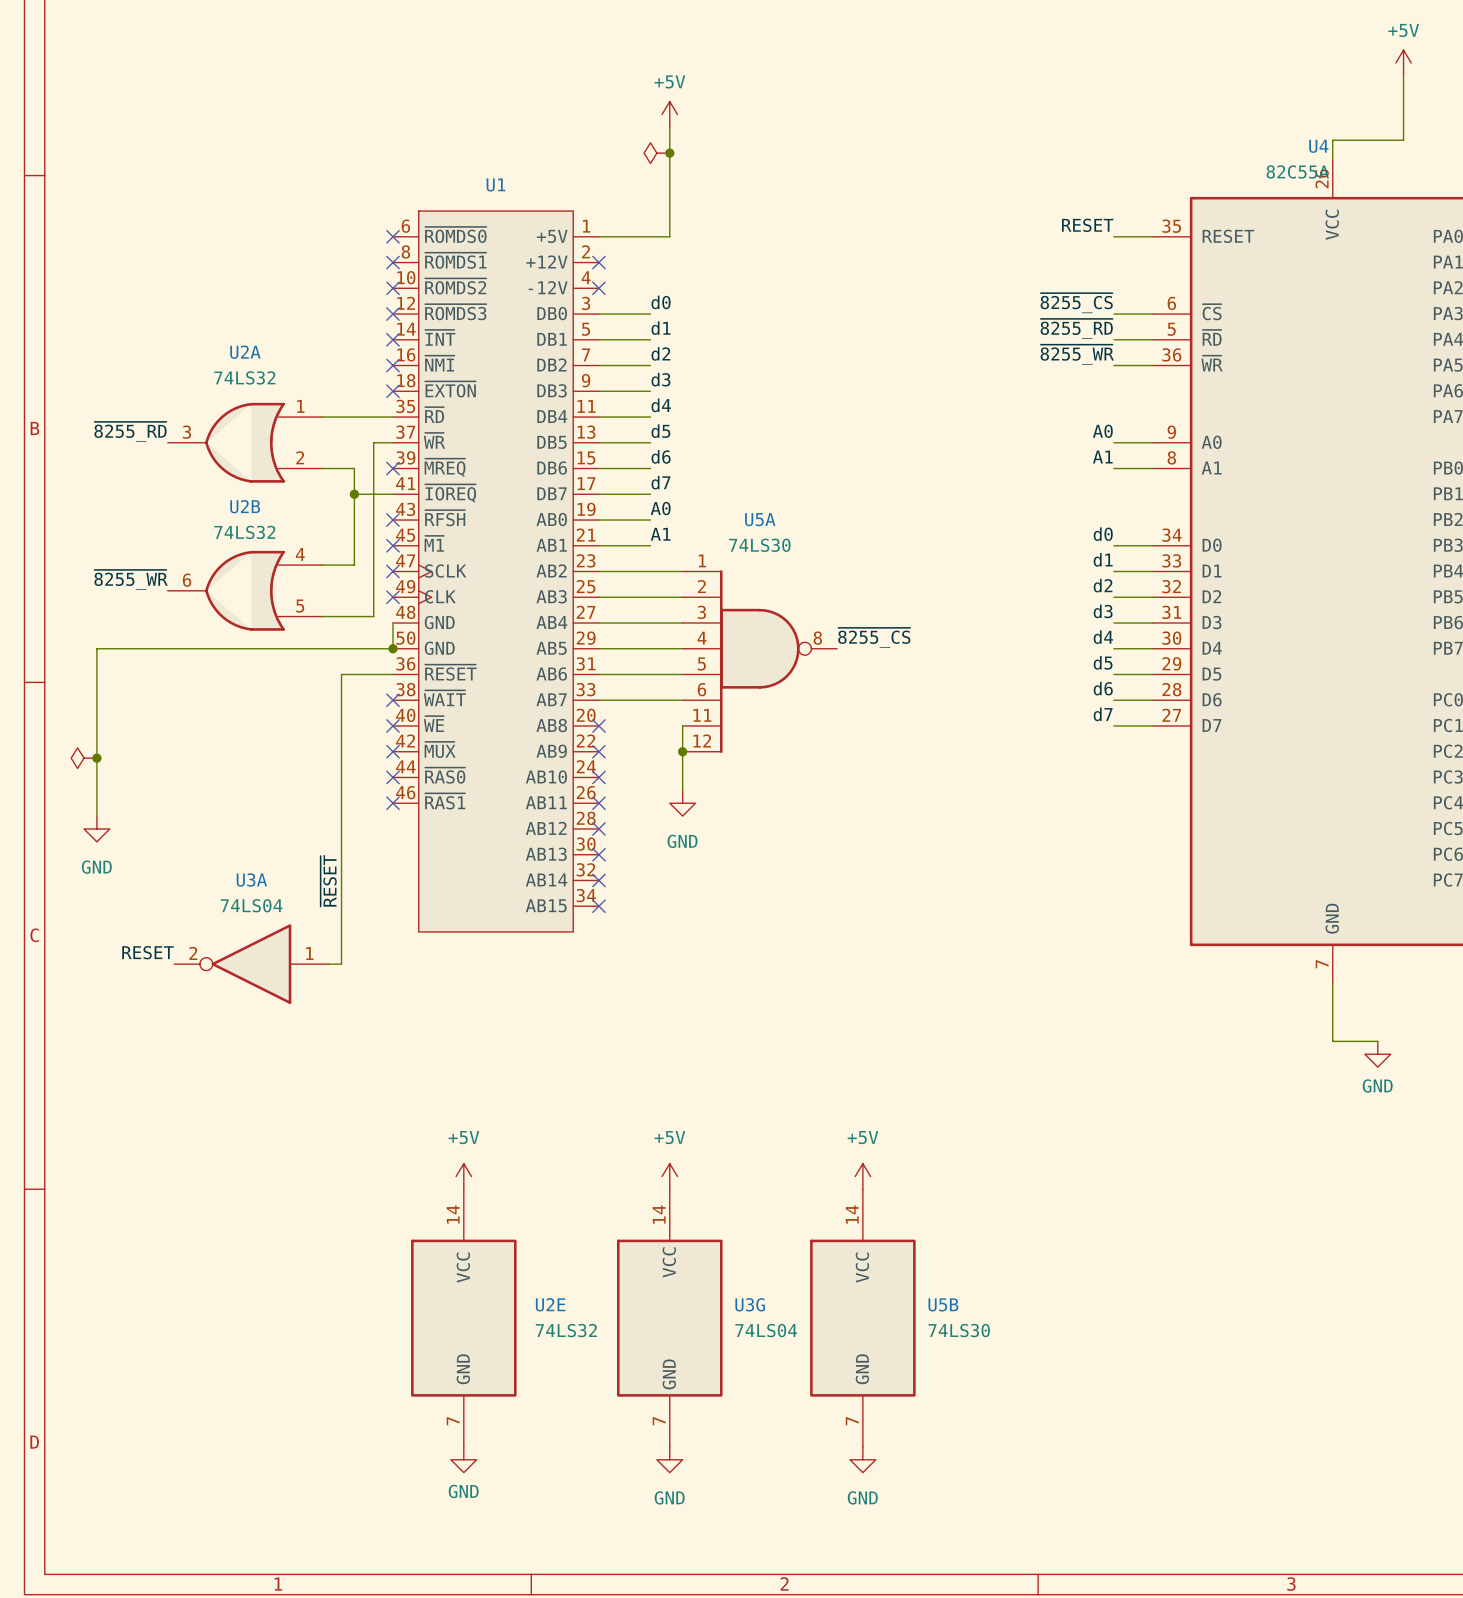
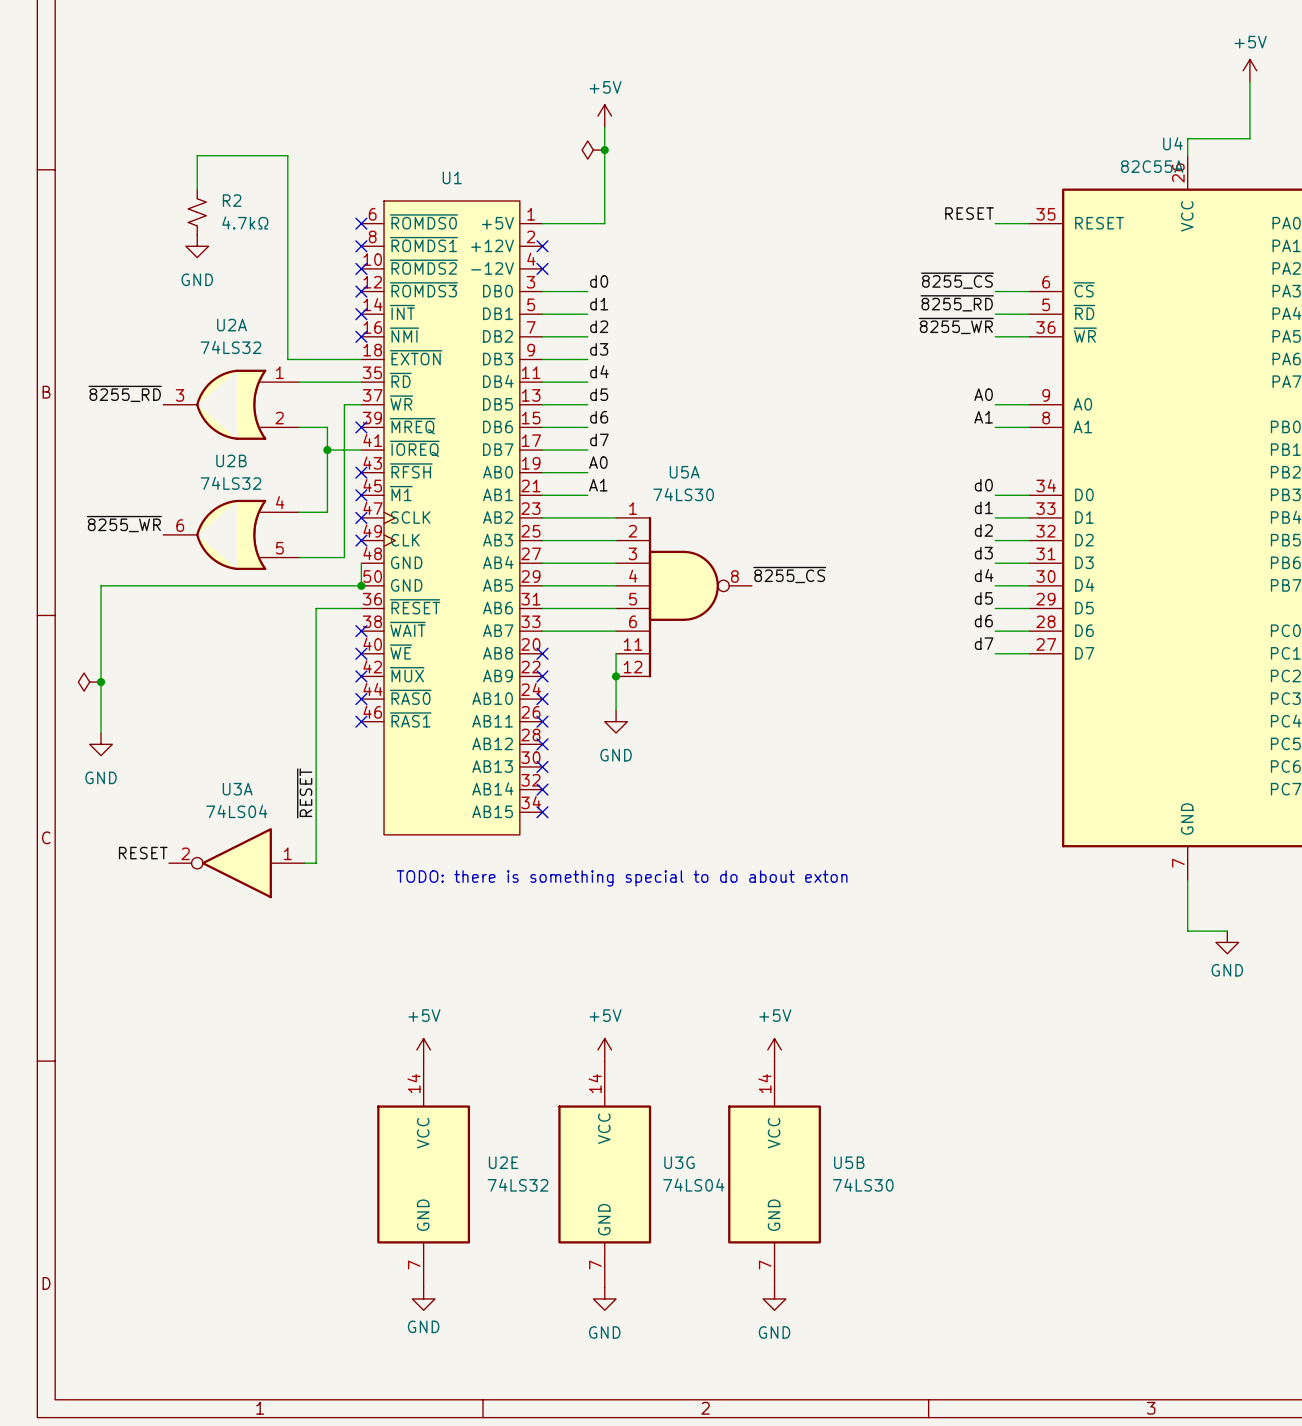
wire: none -> (197, 189) (197, 155) (287, 155) (287, 359) (361, 359)
R2: none -> 4.7kΩ (197, 212)
power symbol: none -> GND (197, 246)
no-connect mark: (393, 391) -> none
text: none -> TODO: there is something special to do about exton (622, 878)

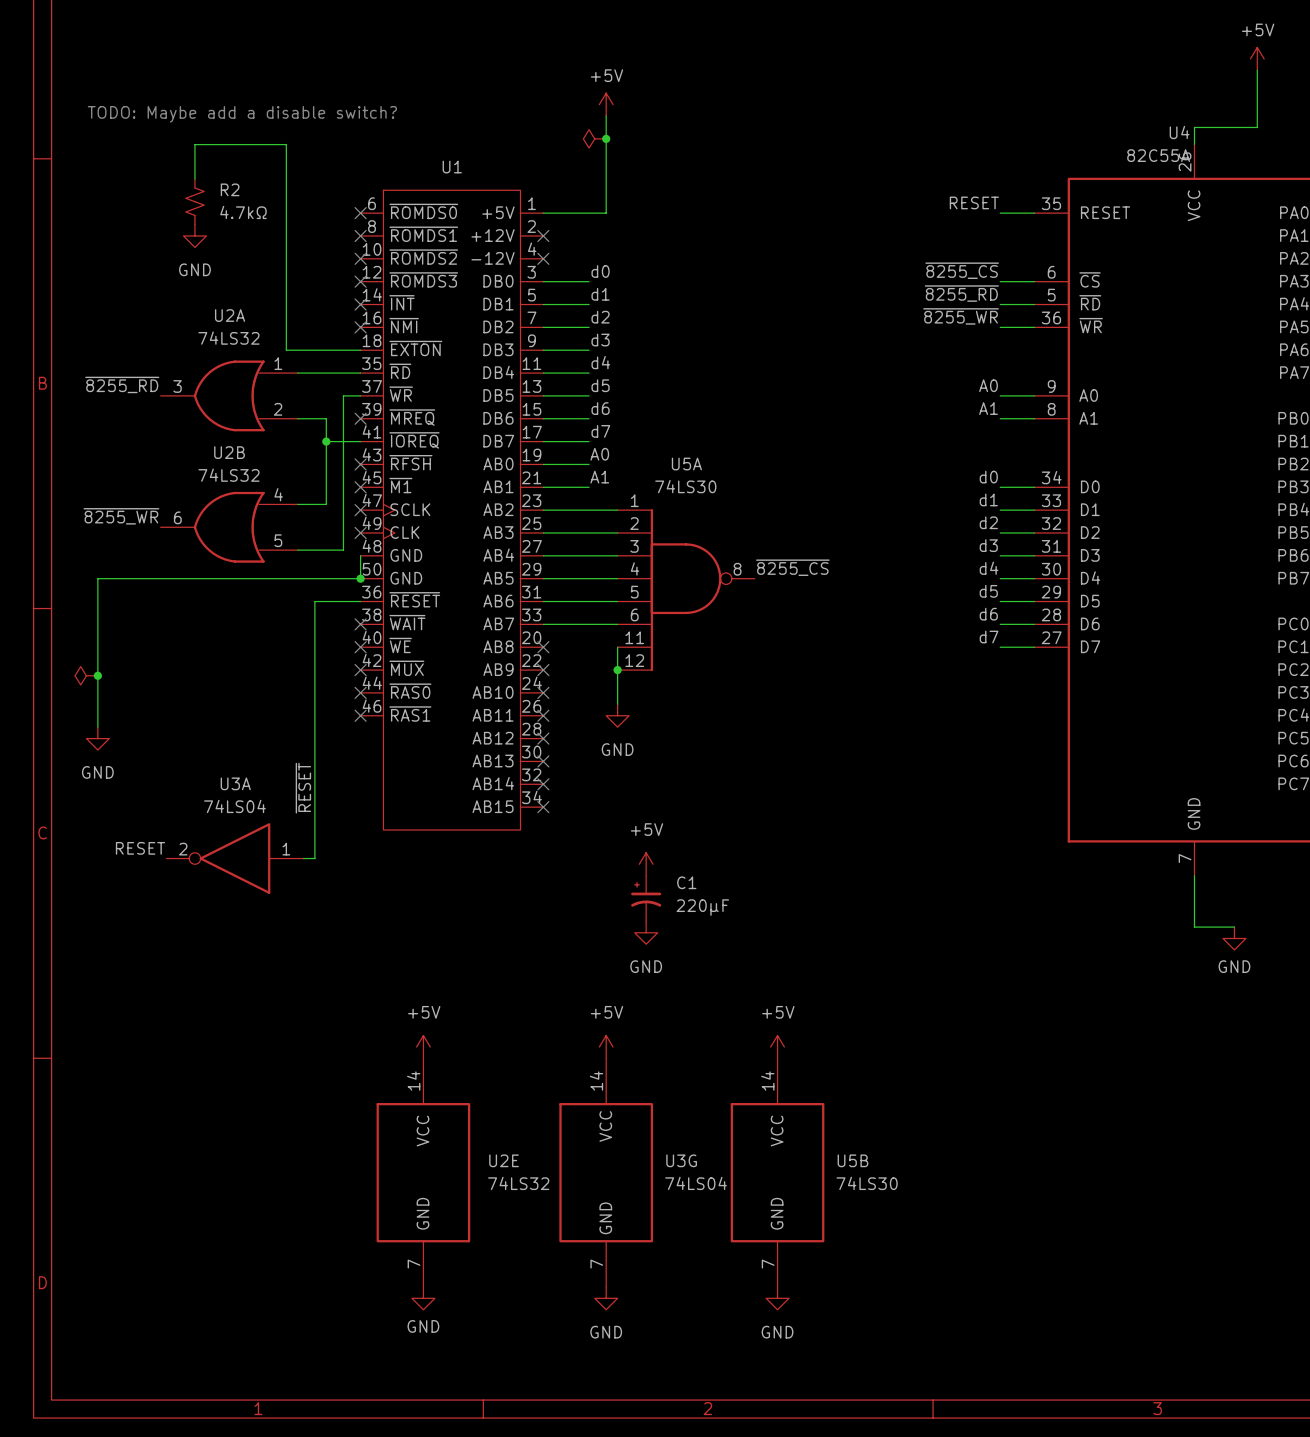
text: none -> TODO: Maybe add a disable switch? (242, 114)
power symbol: none -> +5V (646, 864)
text: TODO: there is something special to do about exton (622, 878) -> none
C1: none -> 220µF (646, 898)
power symbol: none -> GND (646, 932)

